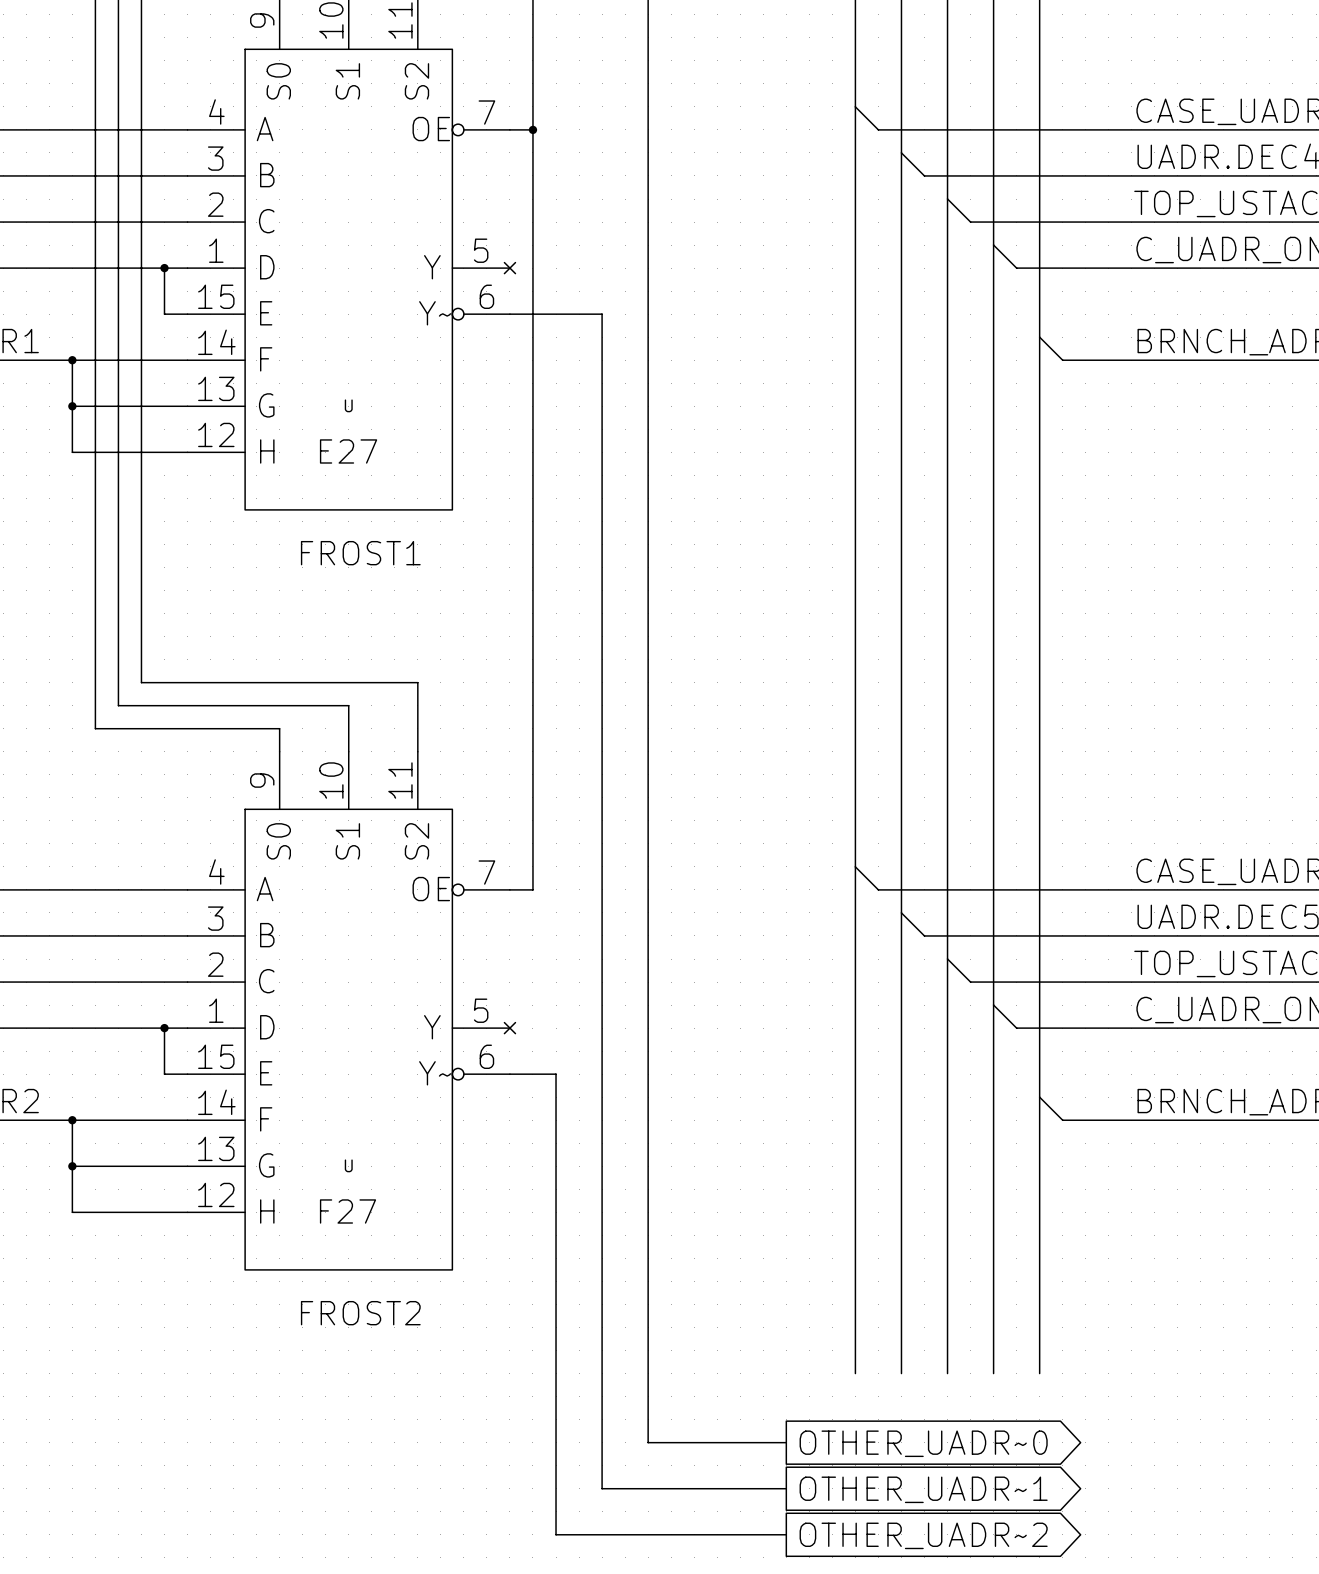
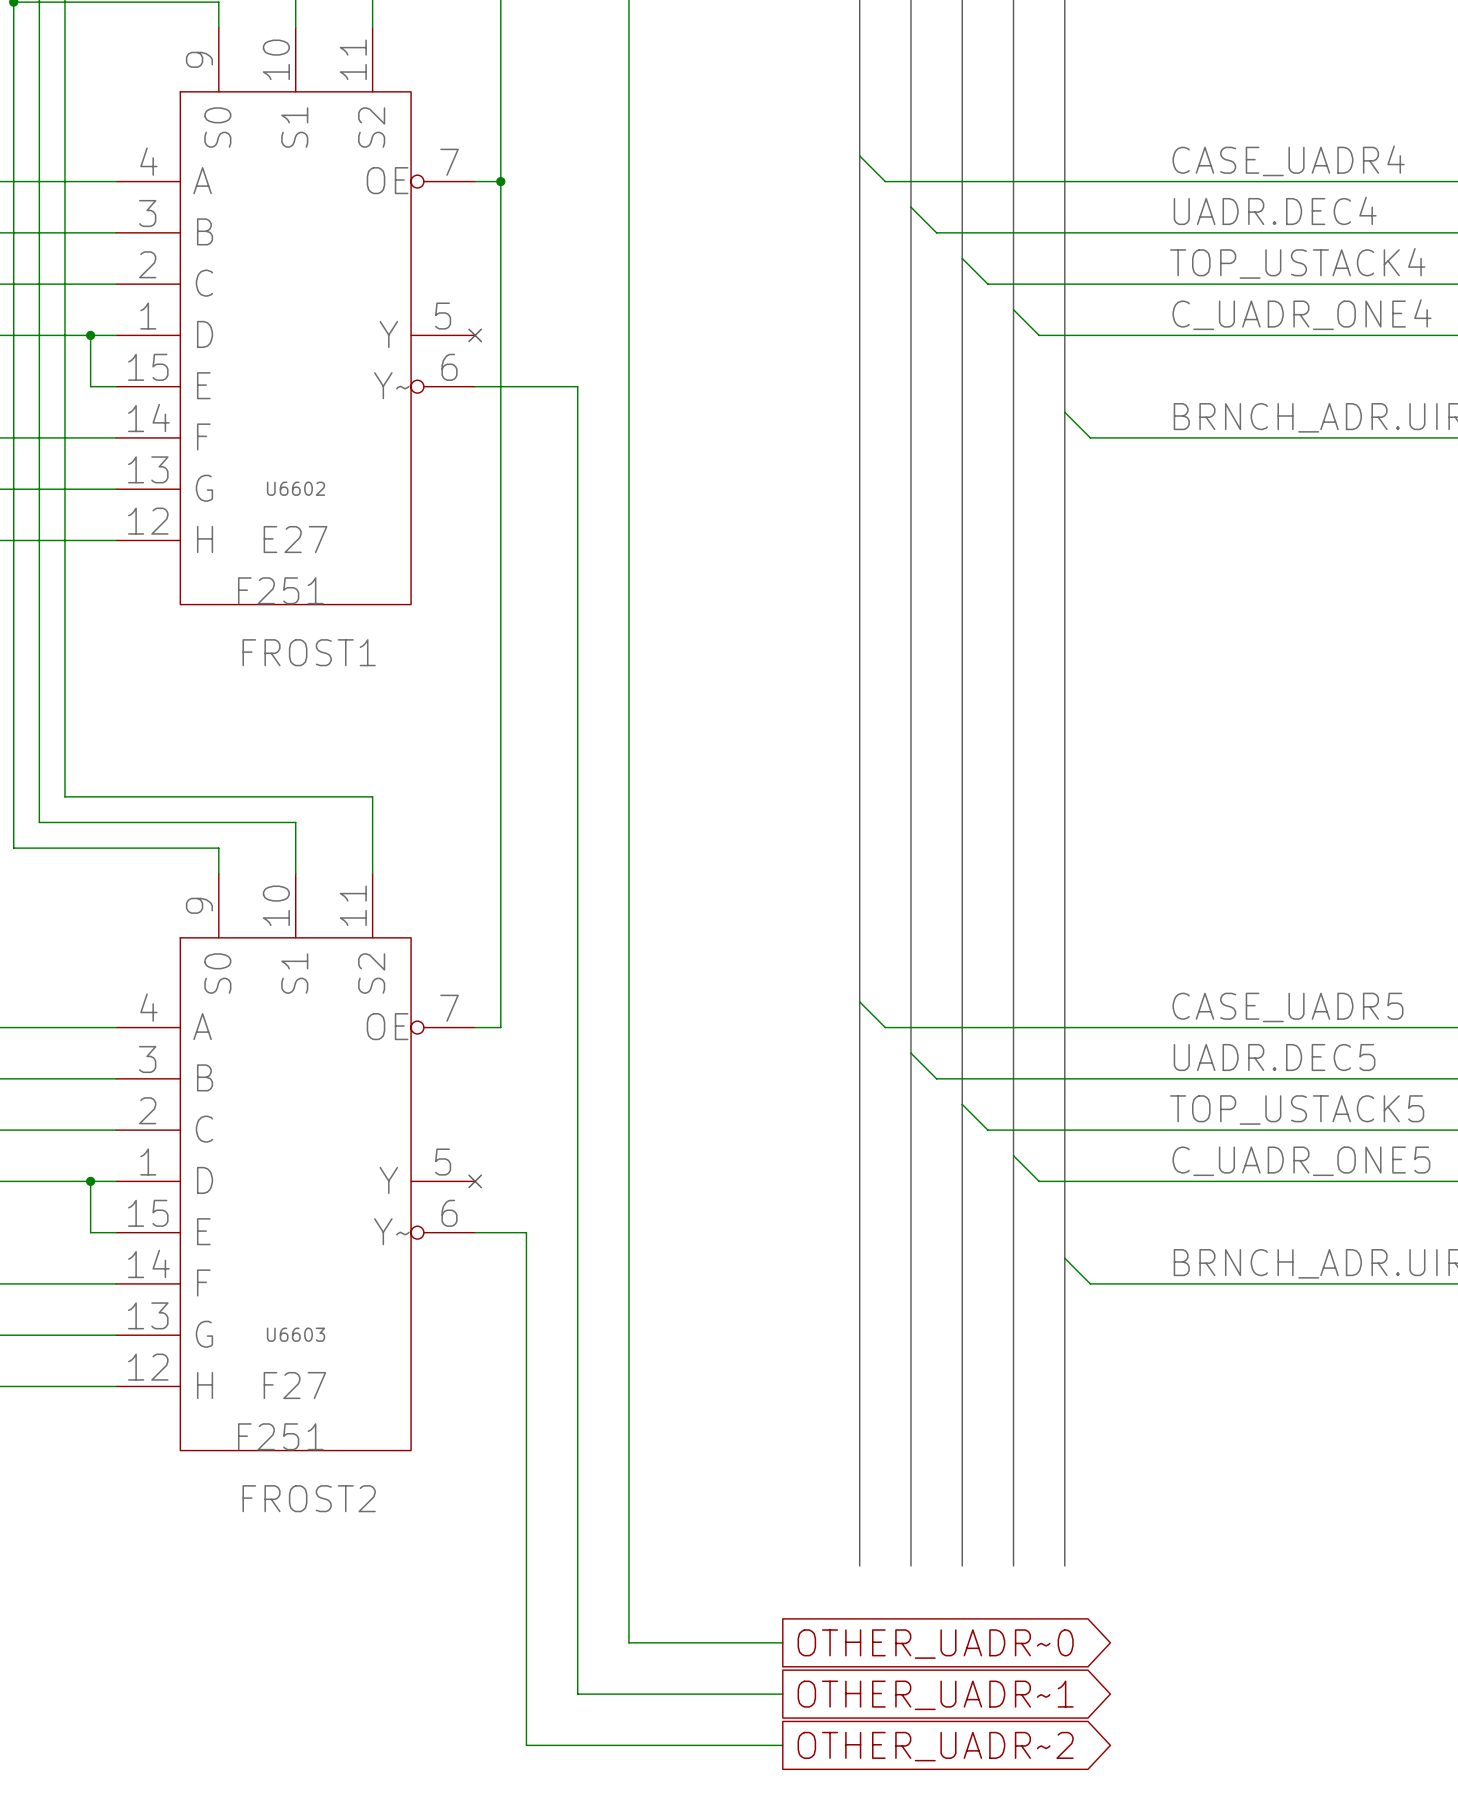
U name: U (348, 405) -> U6602 (296, 488)
U value: none -> F251 (280, 590)
U name: U (348, 1165) -> U6603 (296, 1334)
U value: none -> F251 (280, 1436)

